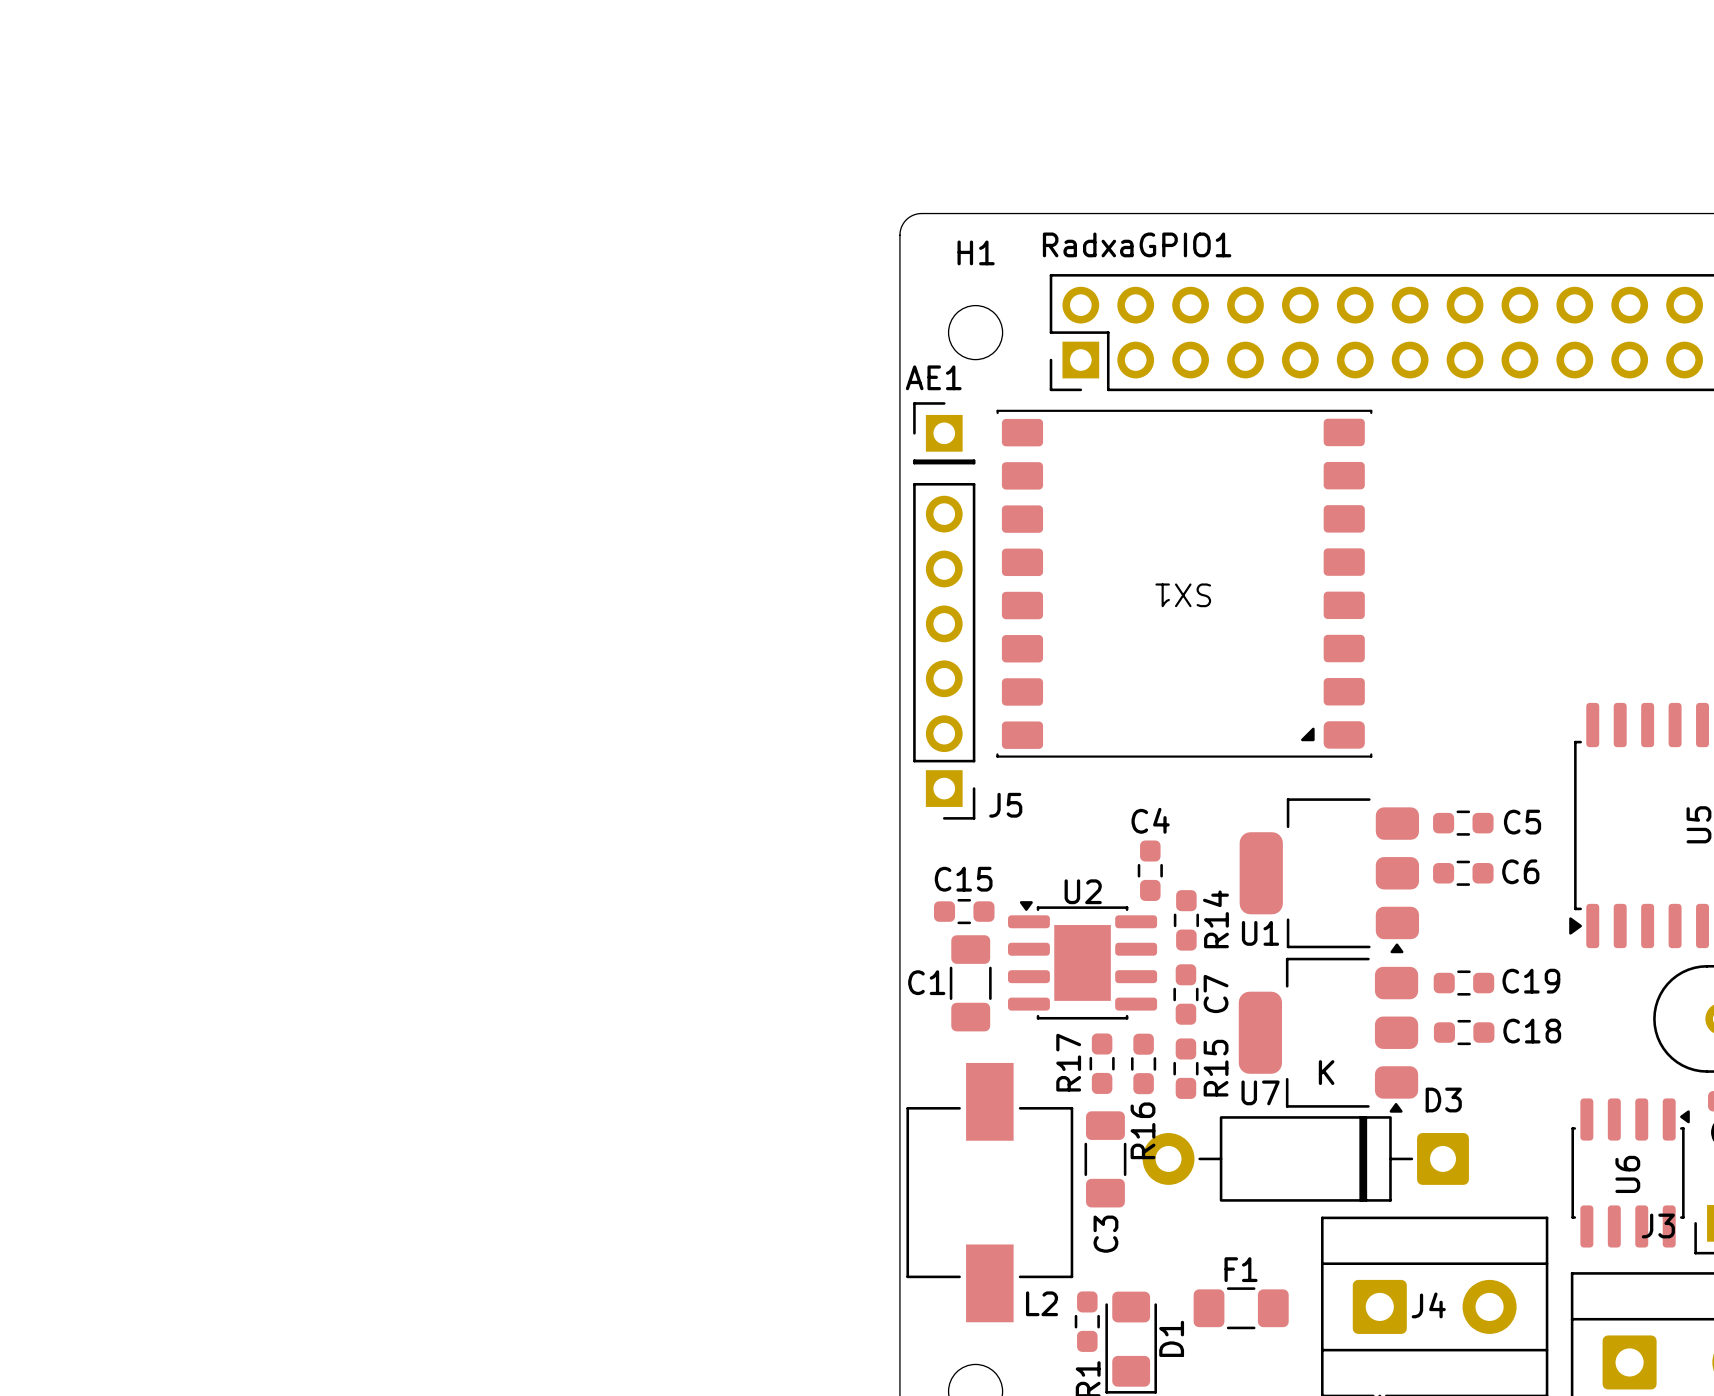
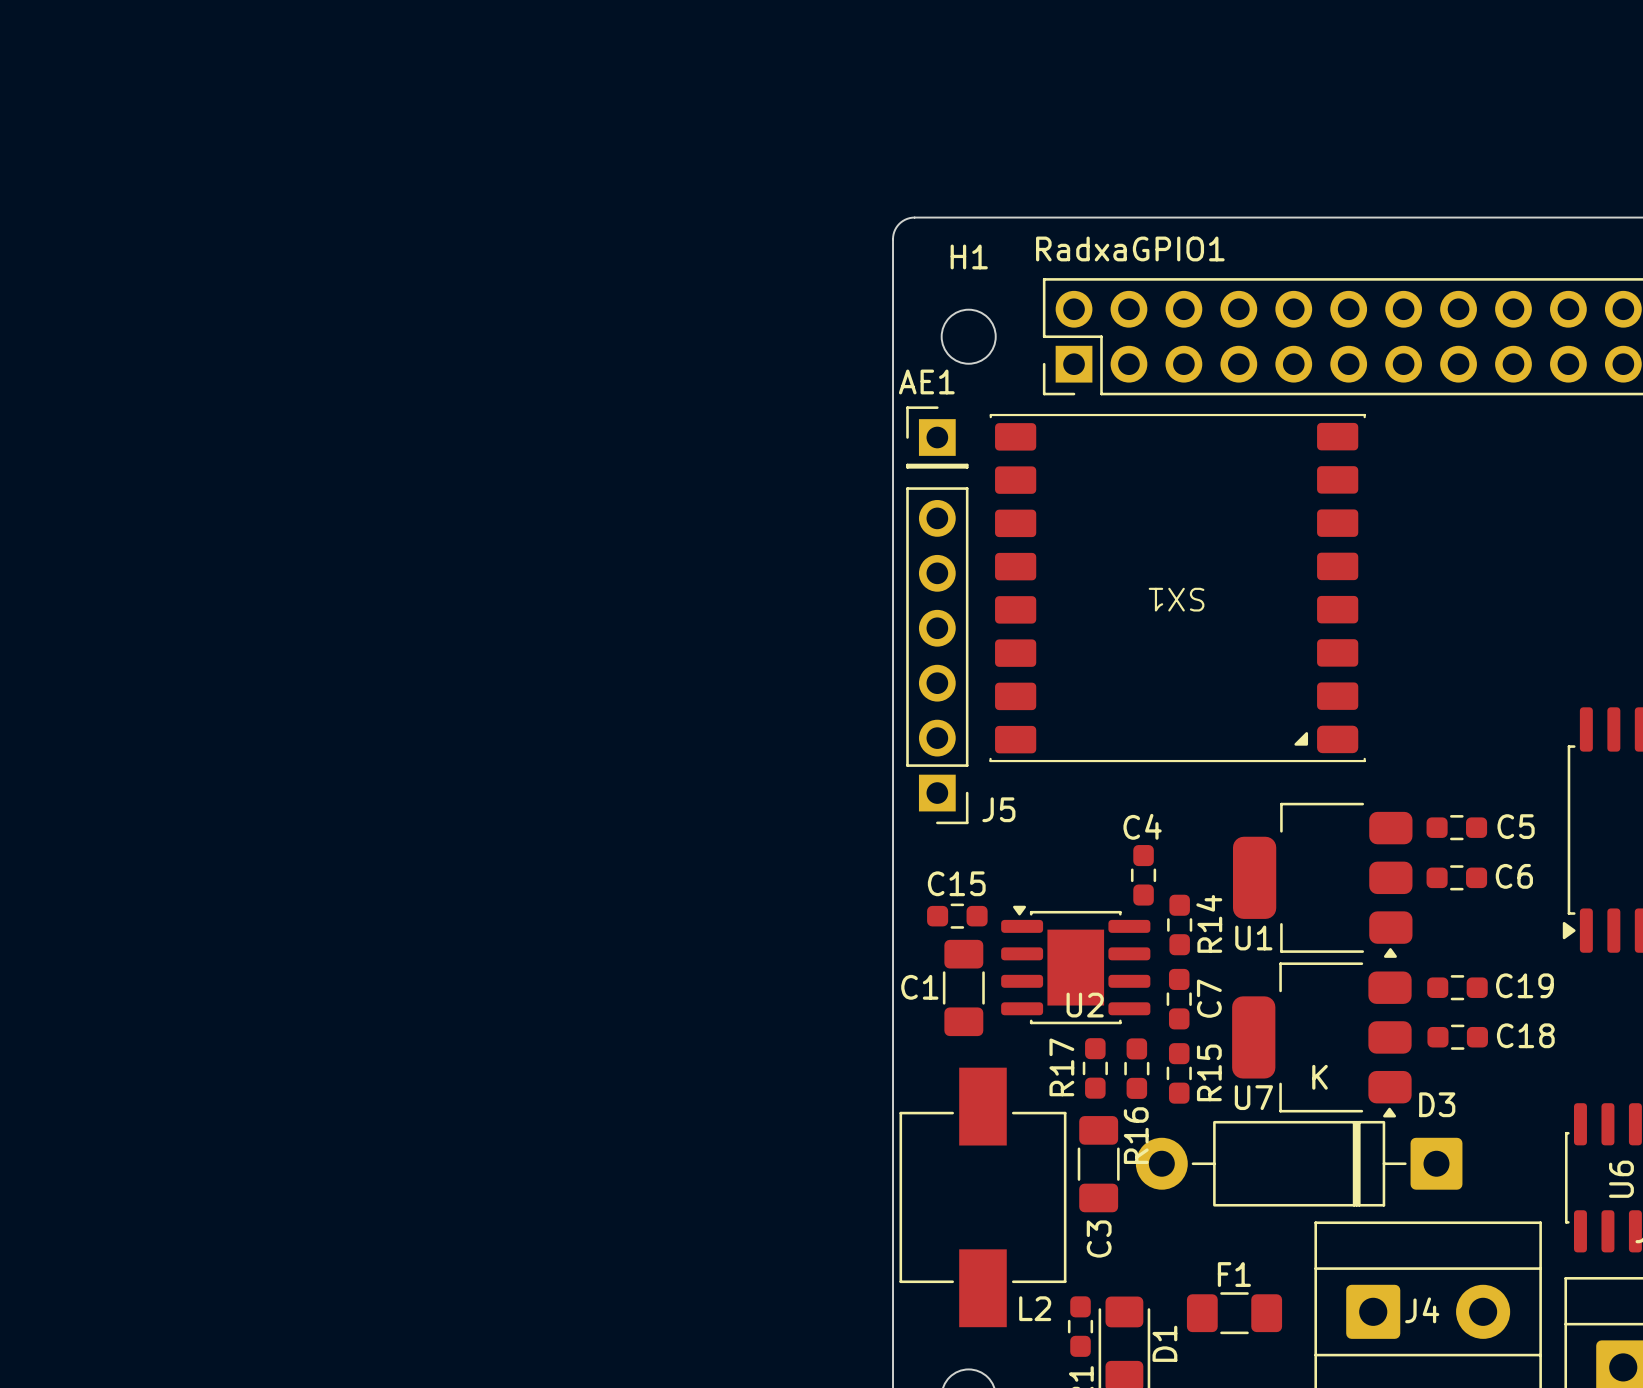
C4 name: C4 (1150, 820) -> none
text: none -> C4 (1142, 826)
U2 name position: U2 (1083, 891) -> U2 (1085, 1005)

